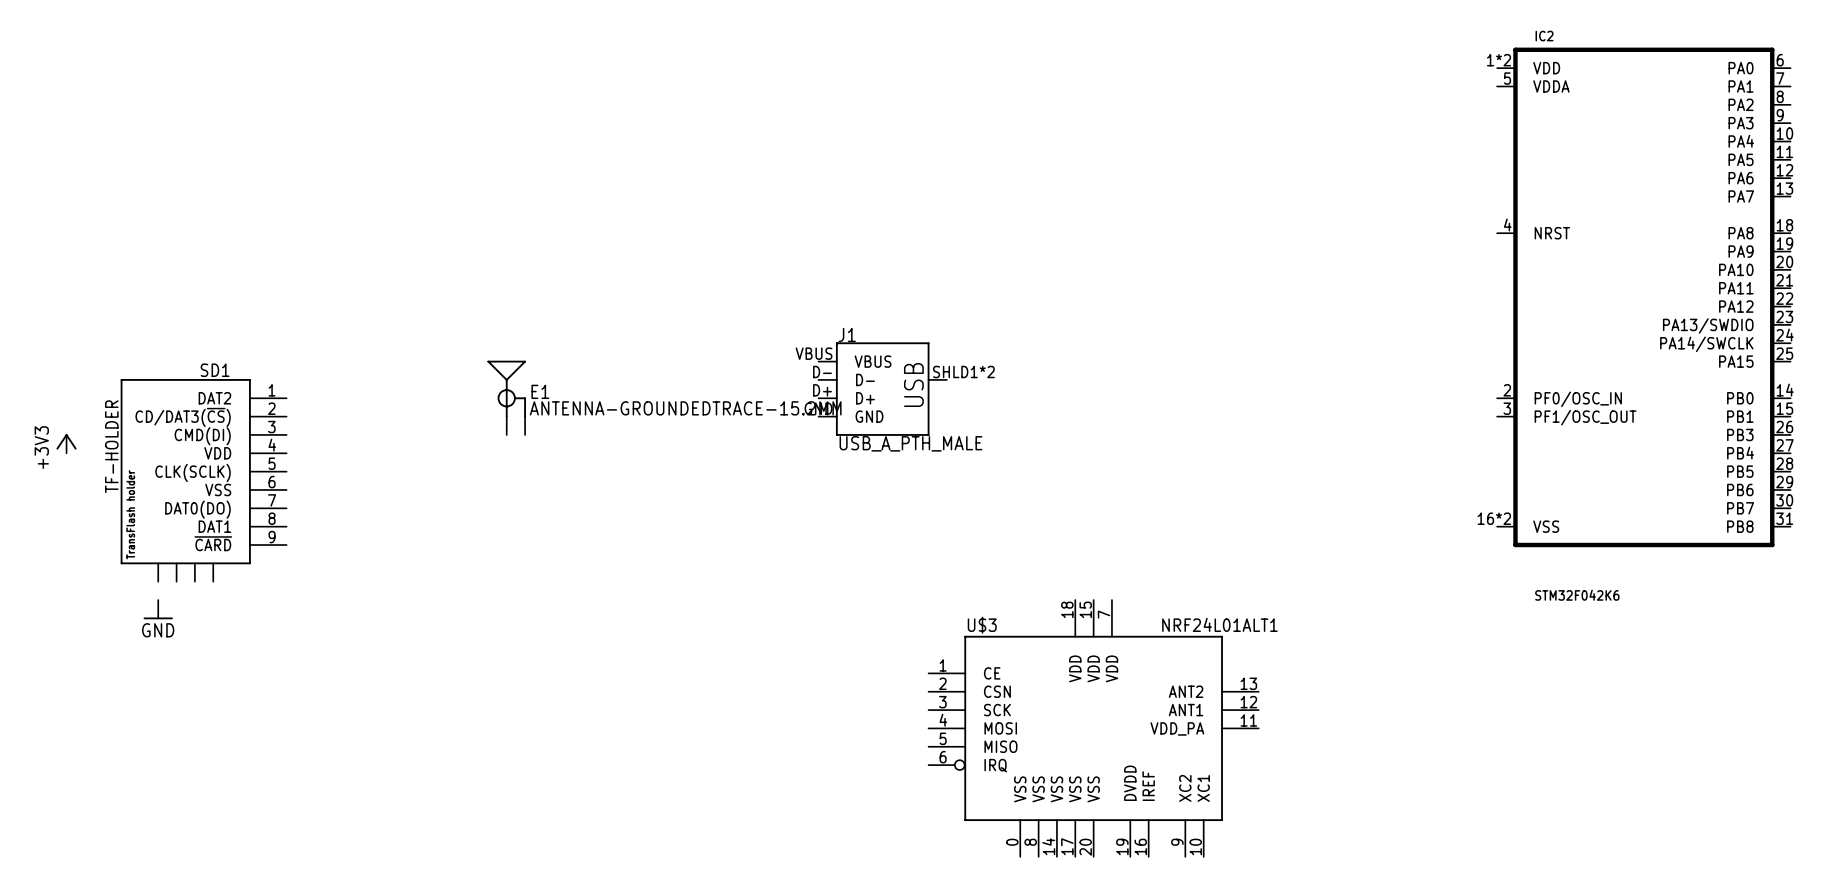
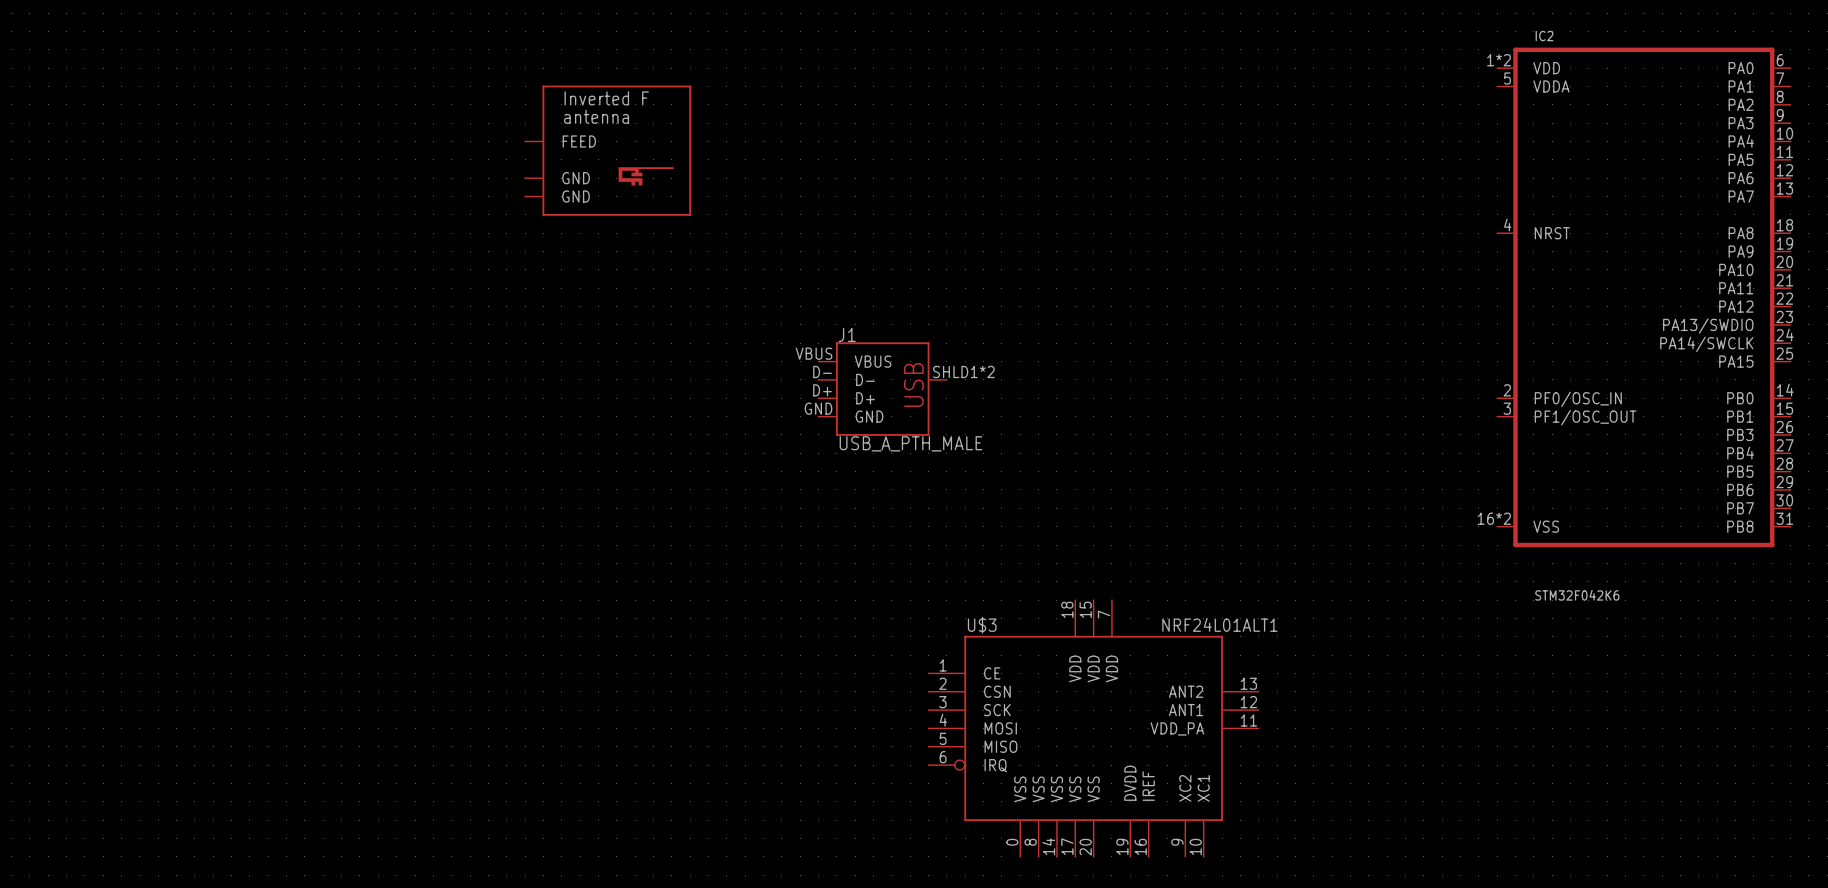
part: none -> (608, 150)
E1: ANTENNA-GROUNDEDTRACE-15.2MM (506, 397) -> none
power symbol: +3V3 (66, 443) -> none
SD1: TF-HOLDER (203, 480) -> none
power symbol: GND (158, 609) -> none

